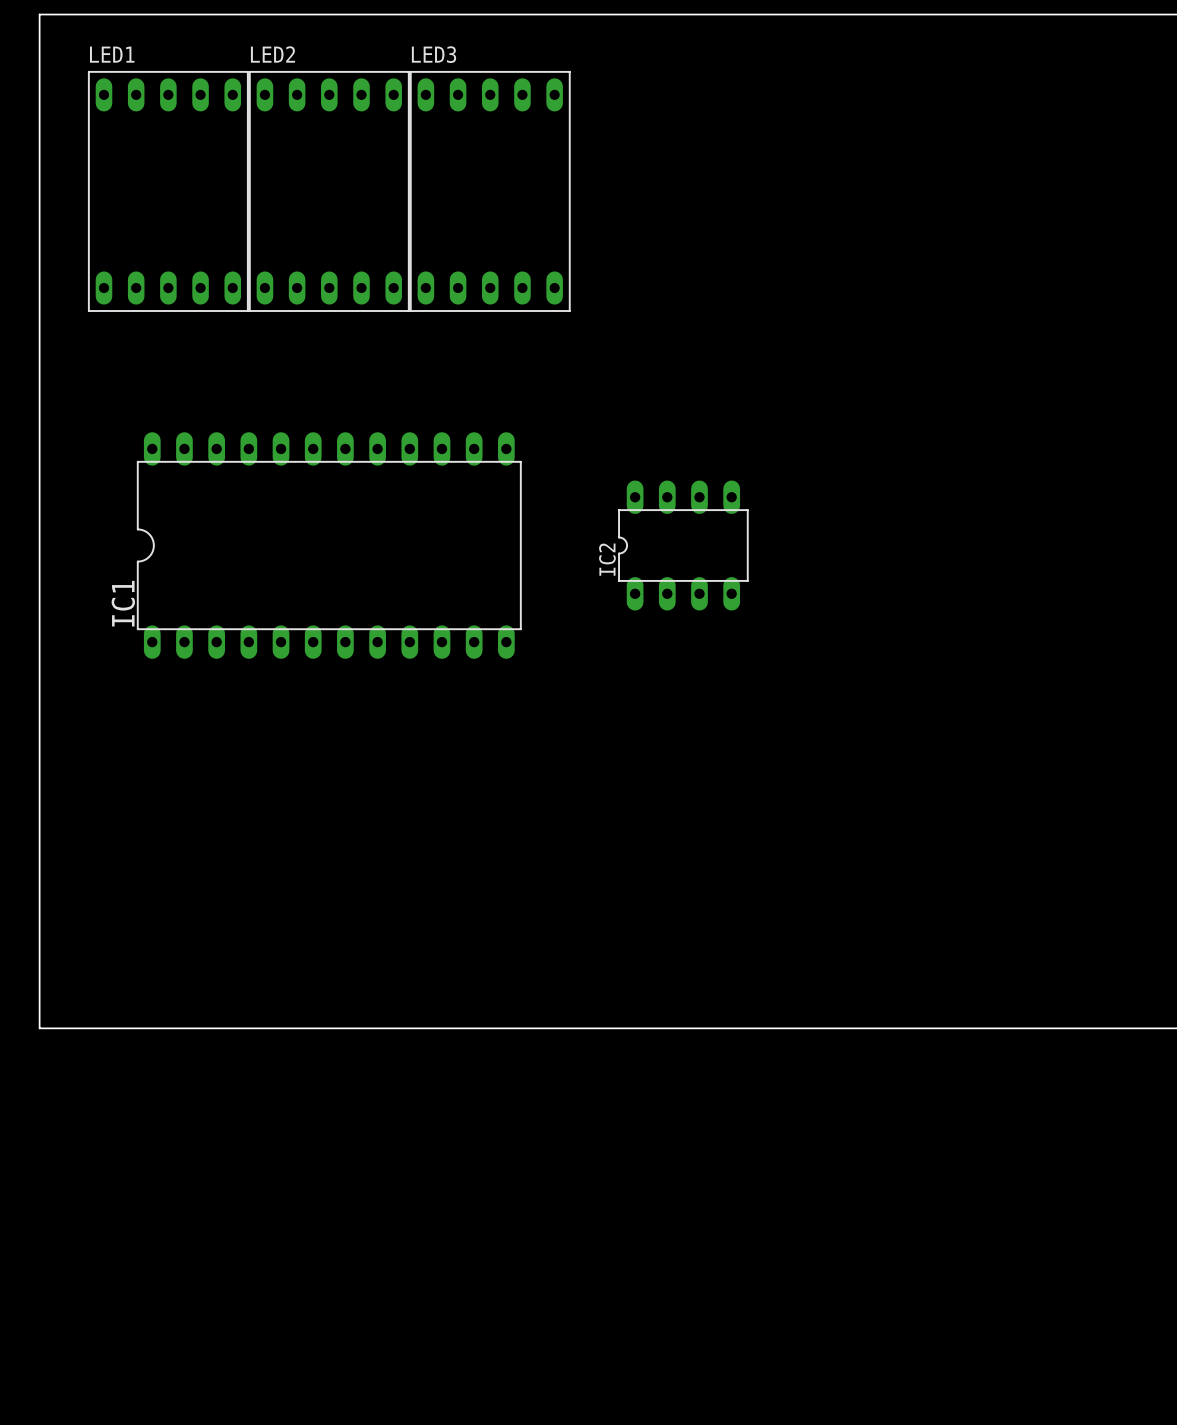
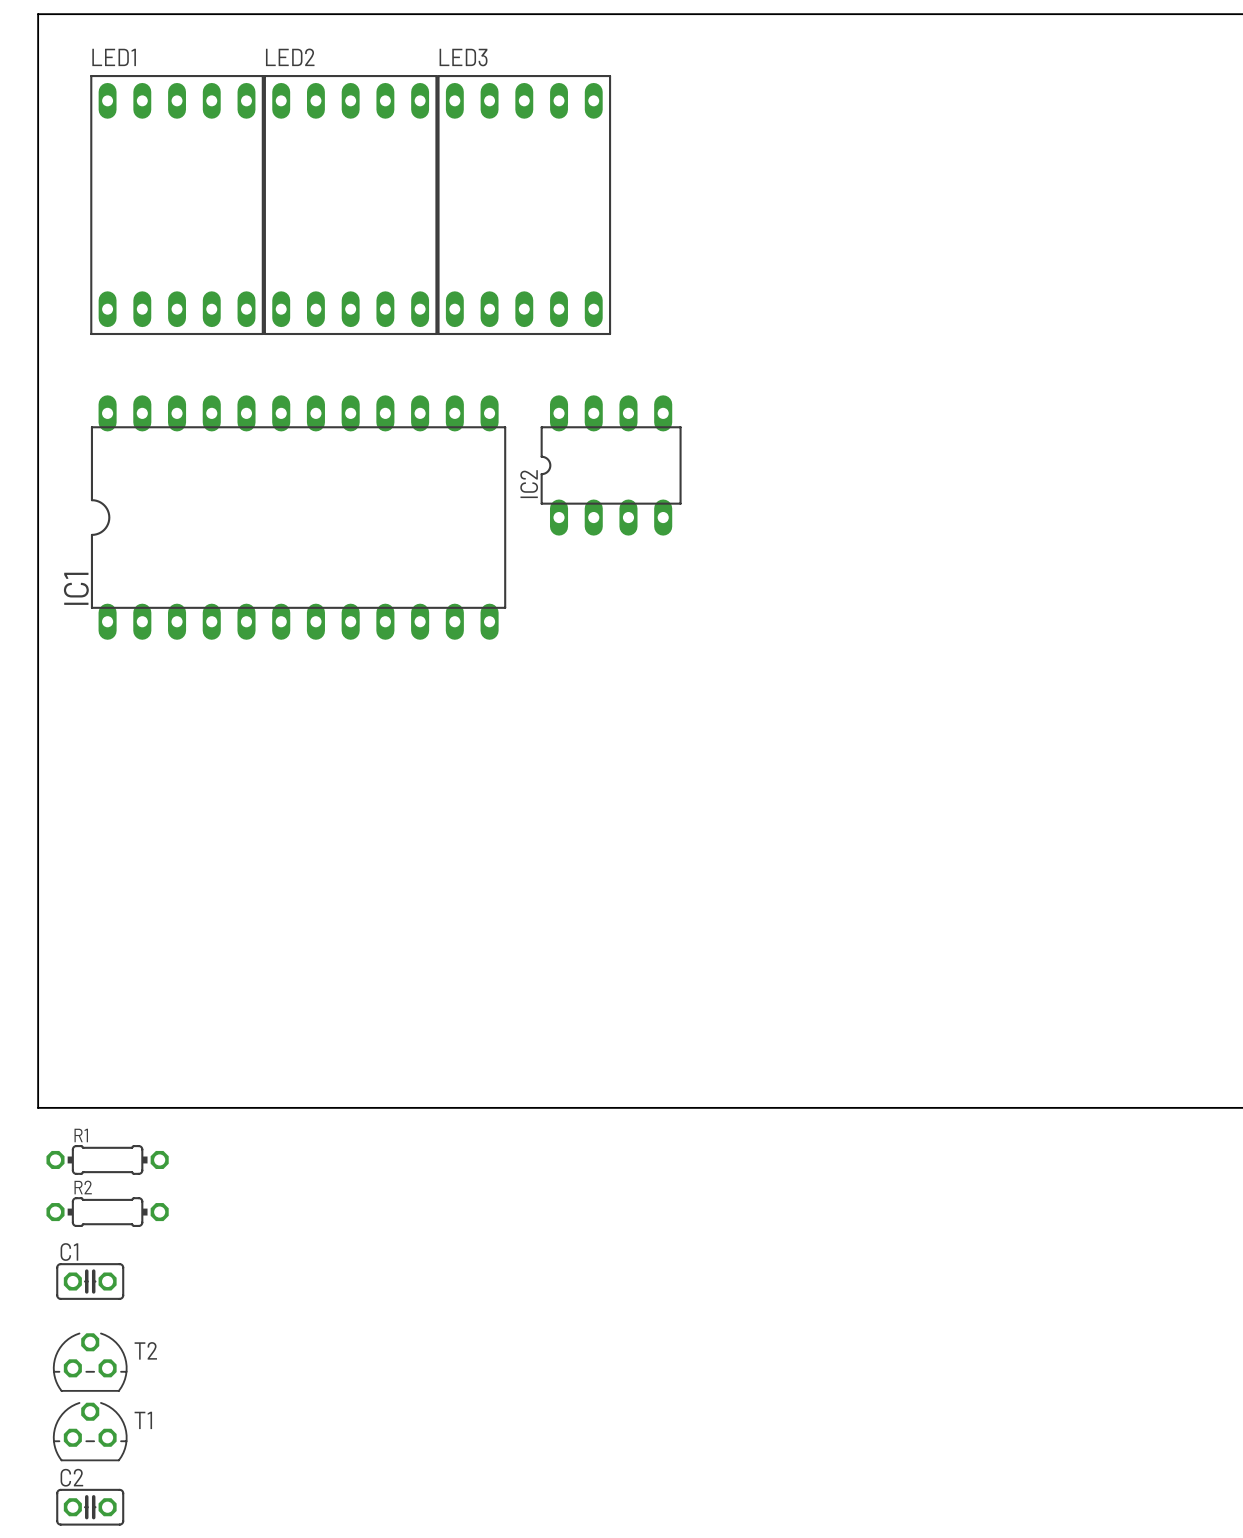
IC1 position: (329, 545) -> (298, 517)
IC2 position: (683, 545) -> (611, 465)
R1: none -> (107, 1159)
R2: none -> (107, 1212)
C1: none -> (90, 1281)
T2: none -> (90, 1362)
T1: none -> (90, 1431)
C2: none -> (90, 1507)

